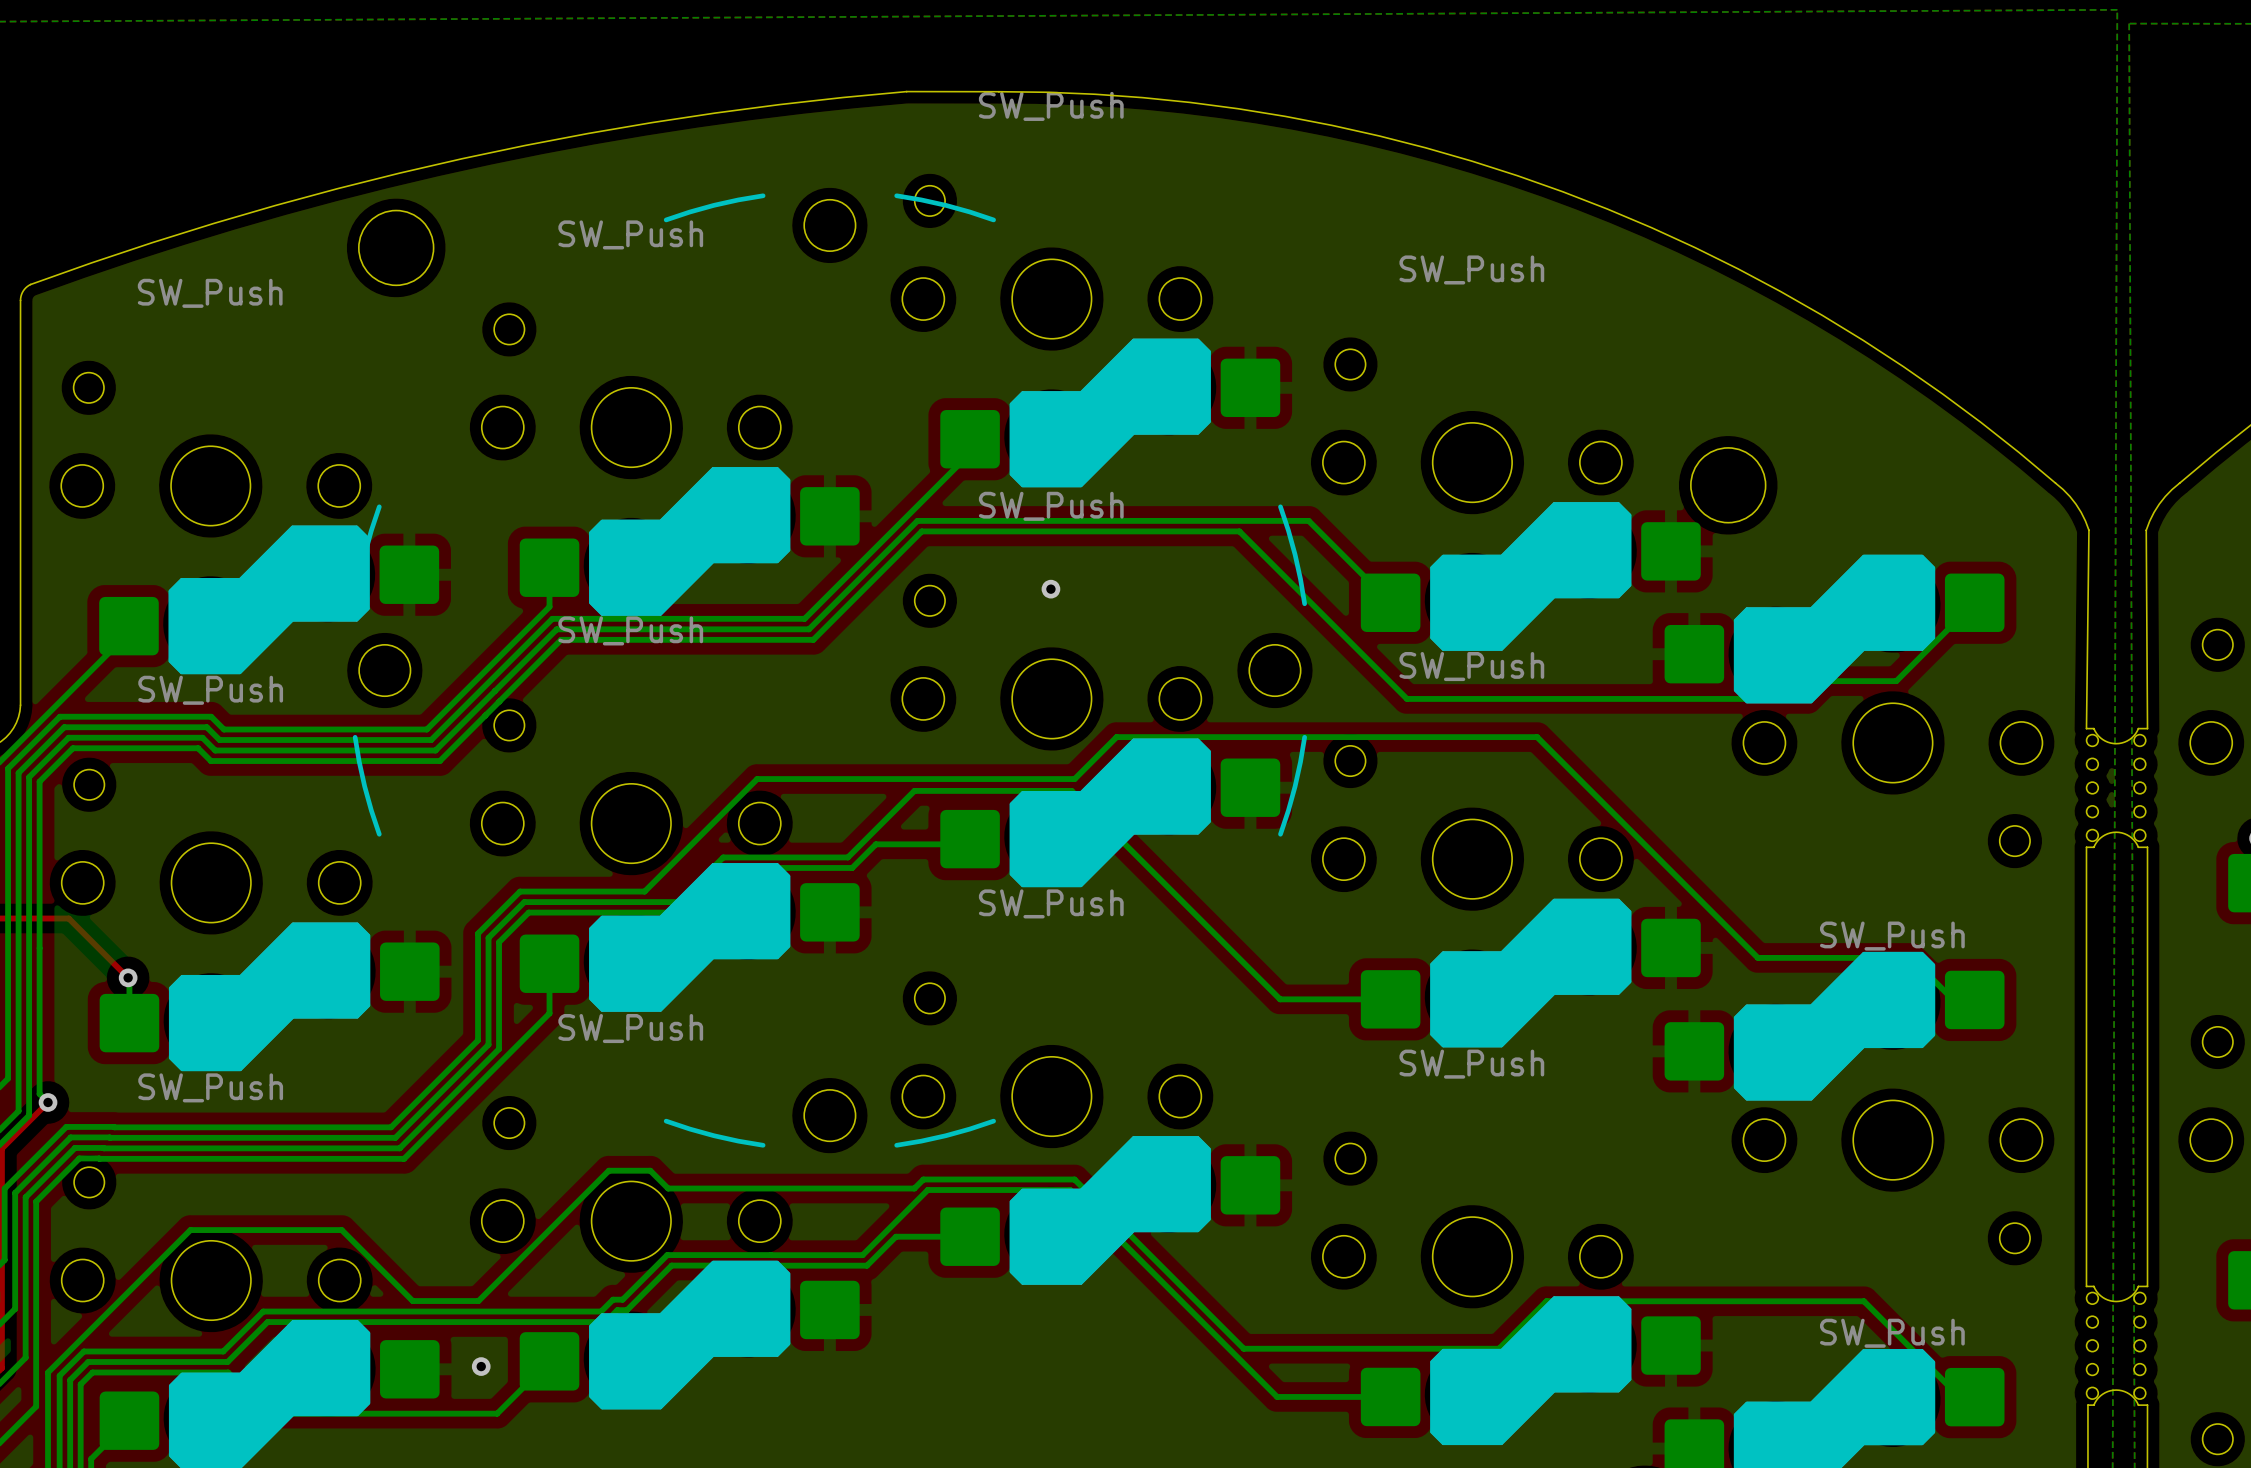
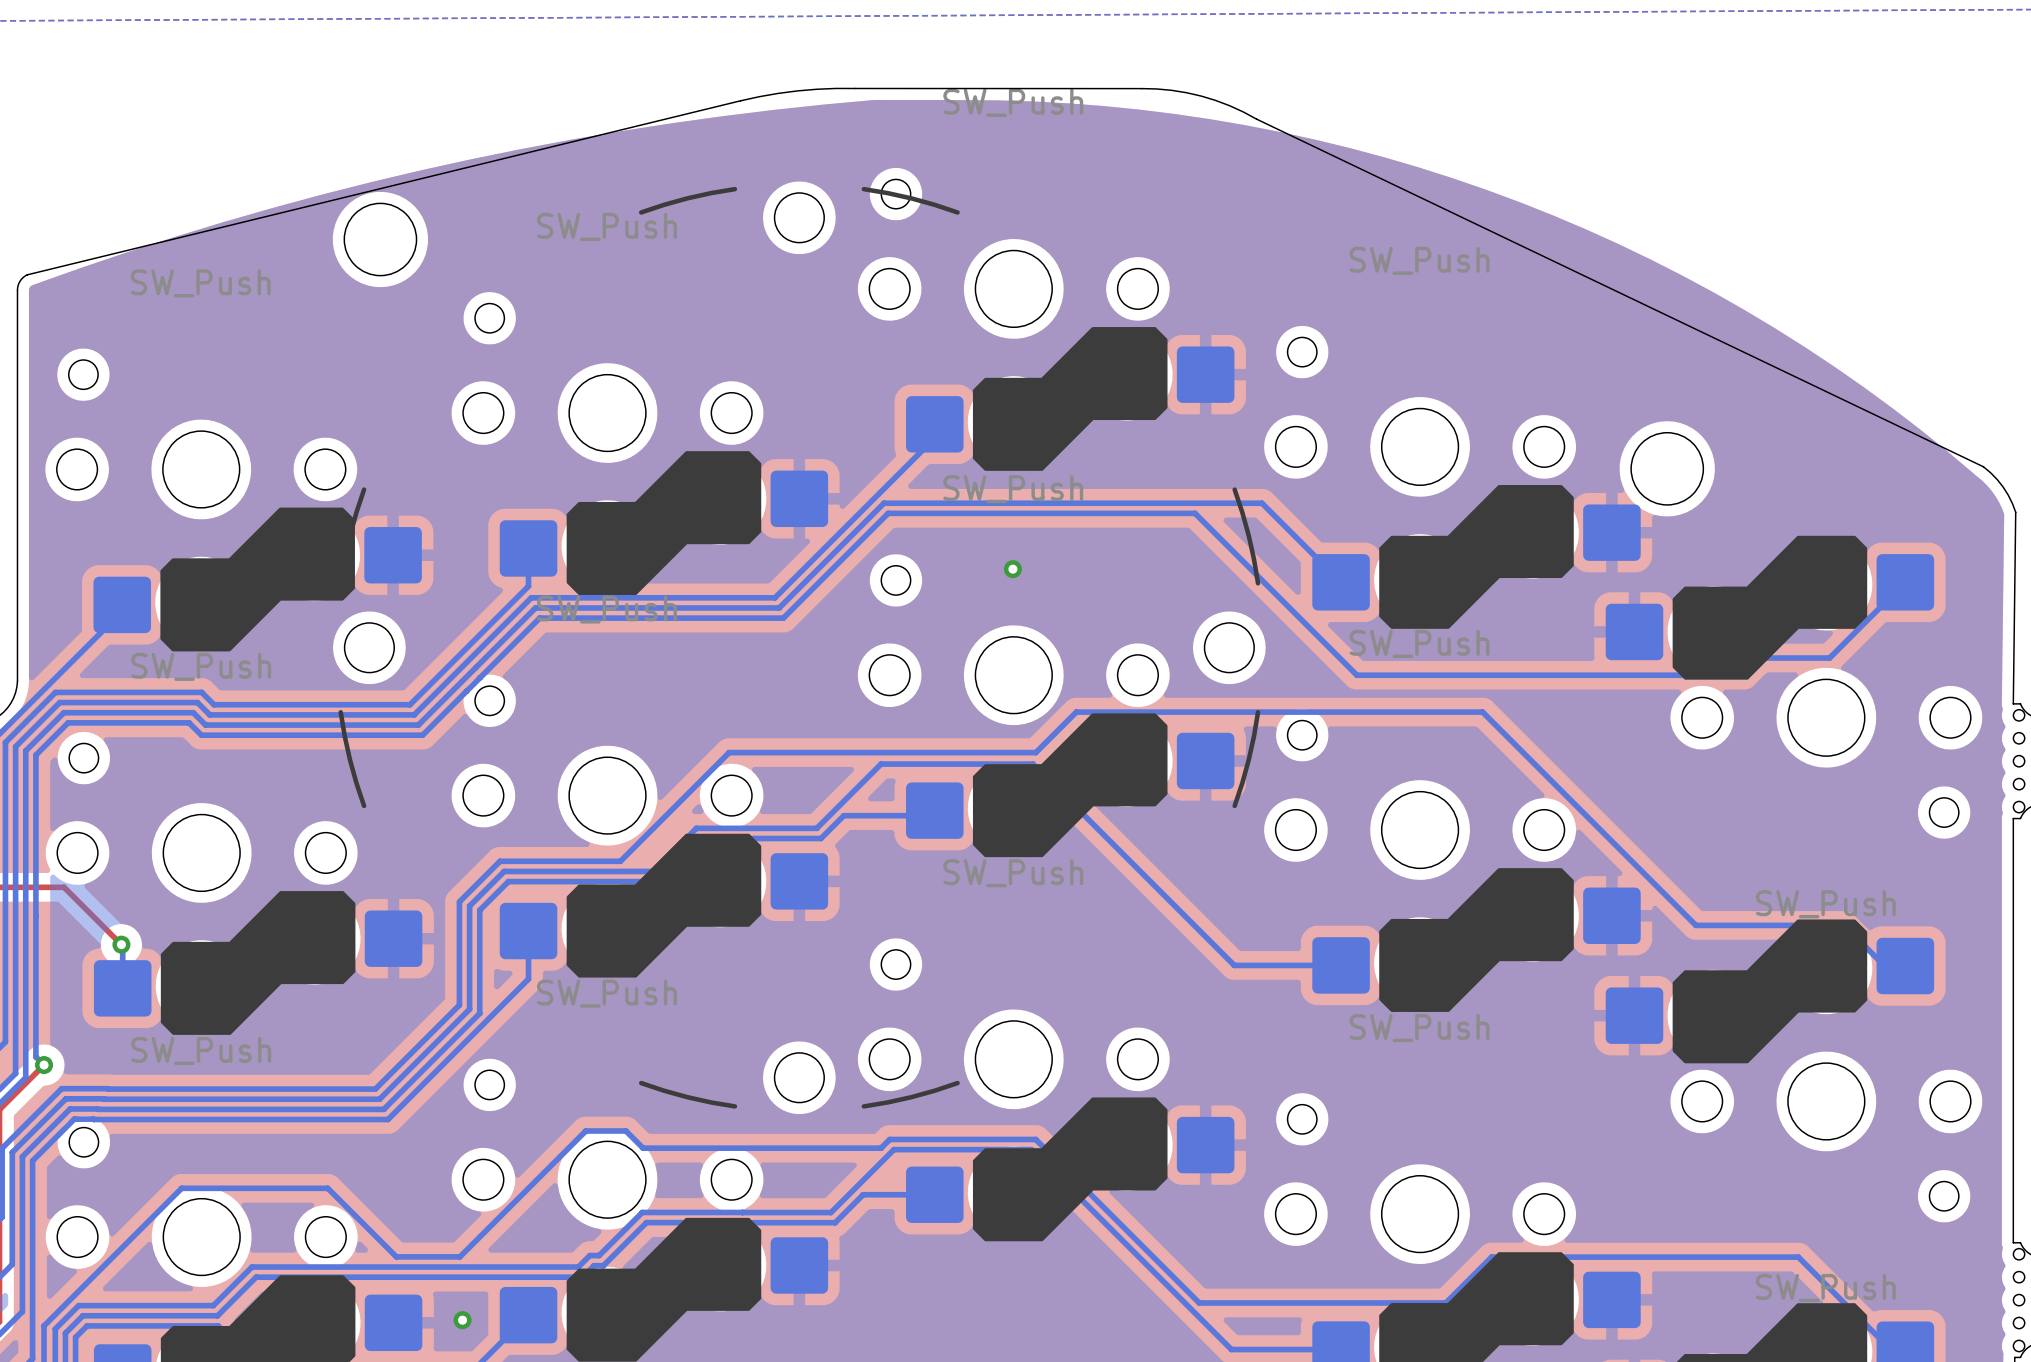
board edge: (30, 284) (213, 223) (337, 188) (462, 158) (651, 122) (778, 104) (906, 91) (1046, 92) (1142, 97) (1285, 116) (1379, 135) (1471, 161) (1607, 209) (1738, 268) (1822, 315) (1942, 394) (2055, 483) -> (27, 274) (740, 100) (778, 93) (835, 88) (1141, 88) (1171, 90) (1215, 100) (1243, 111) (1983, 466)

